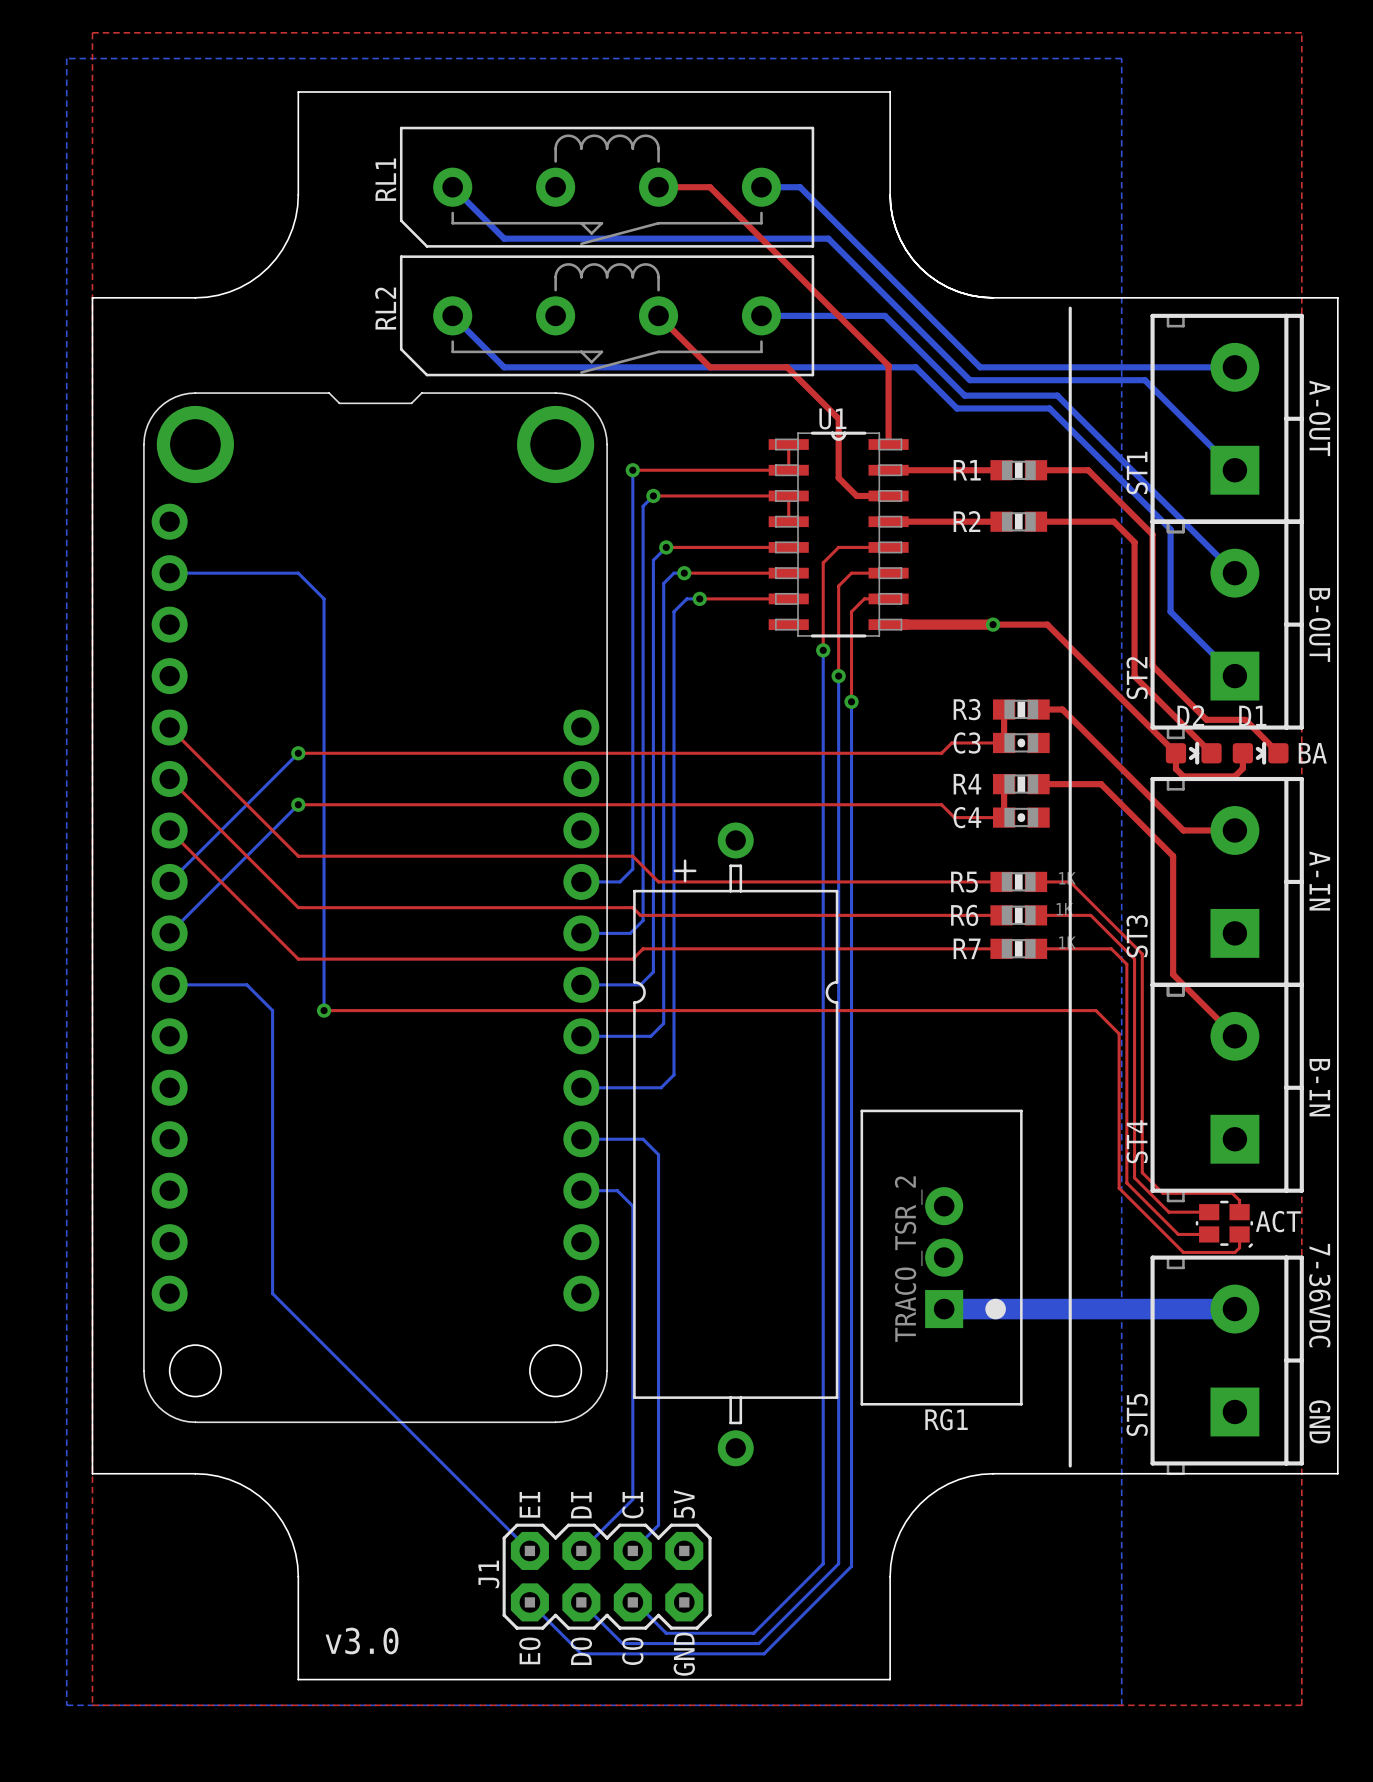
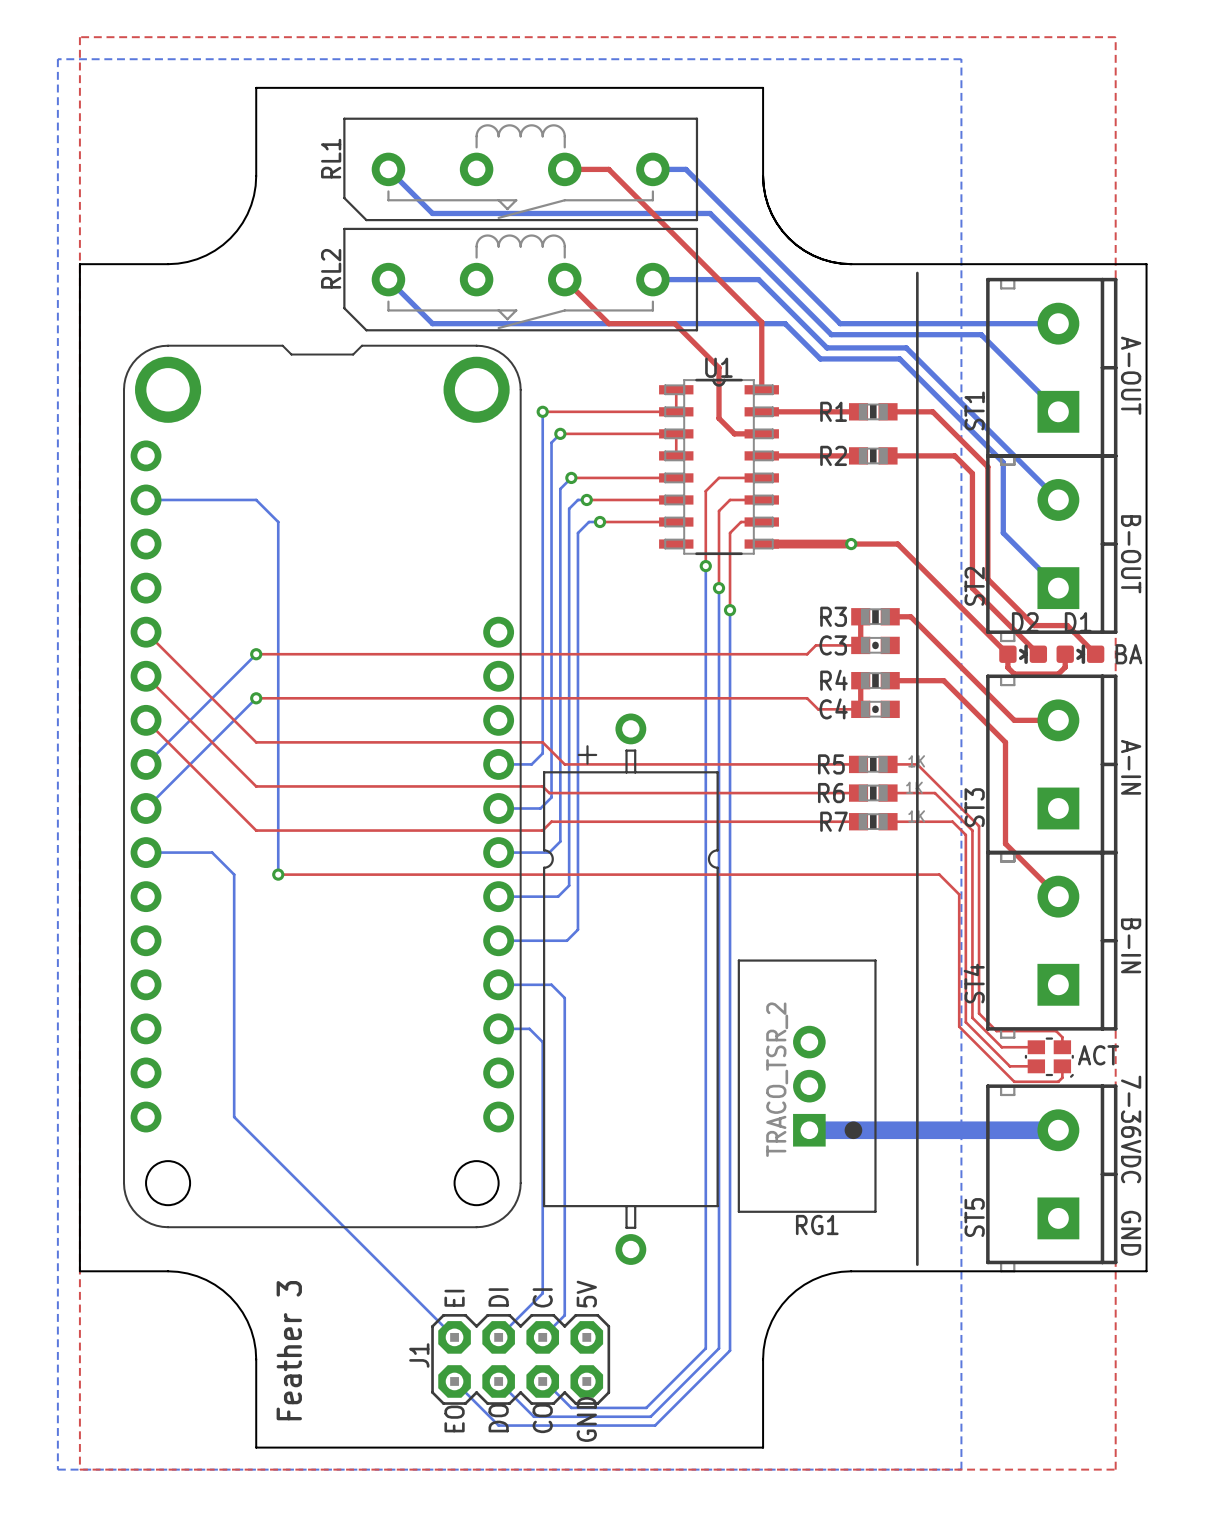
text: none -> Feather 3 (289, 1350)
text: v3.0 (362, 1641) -> none

